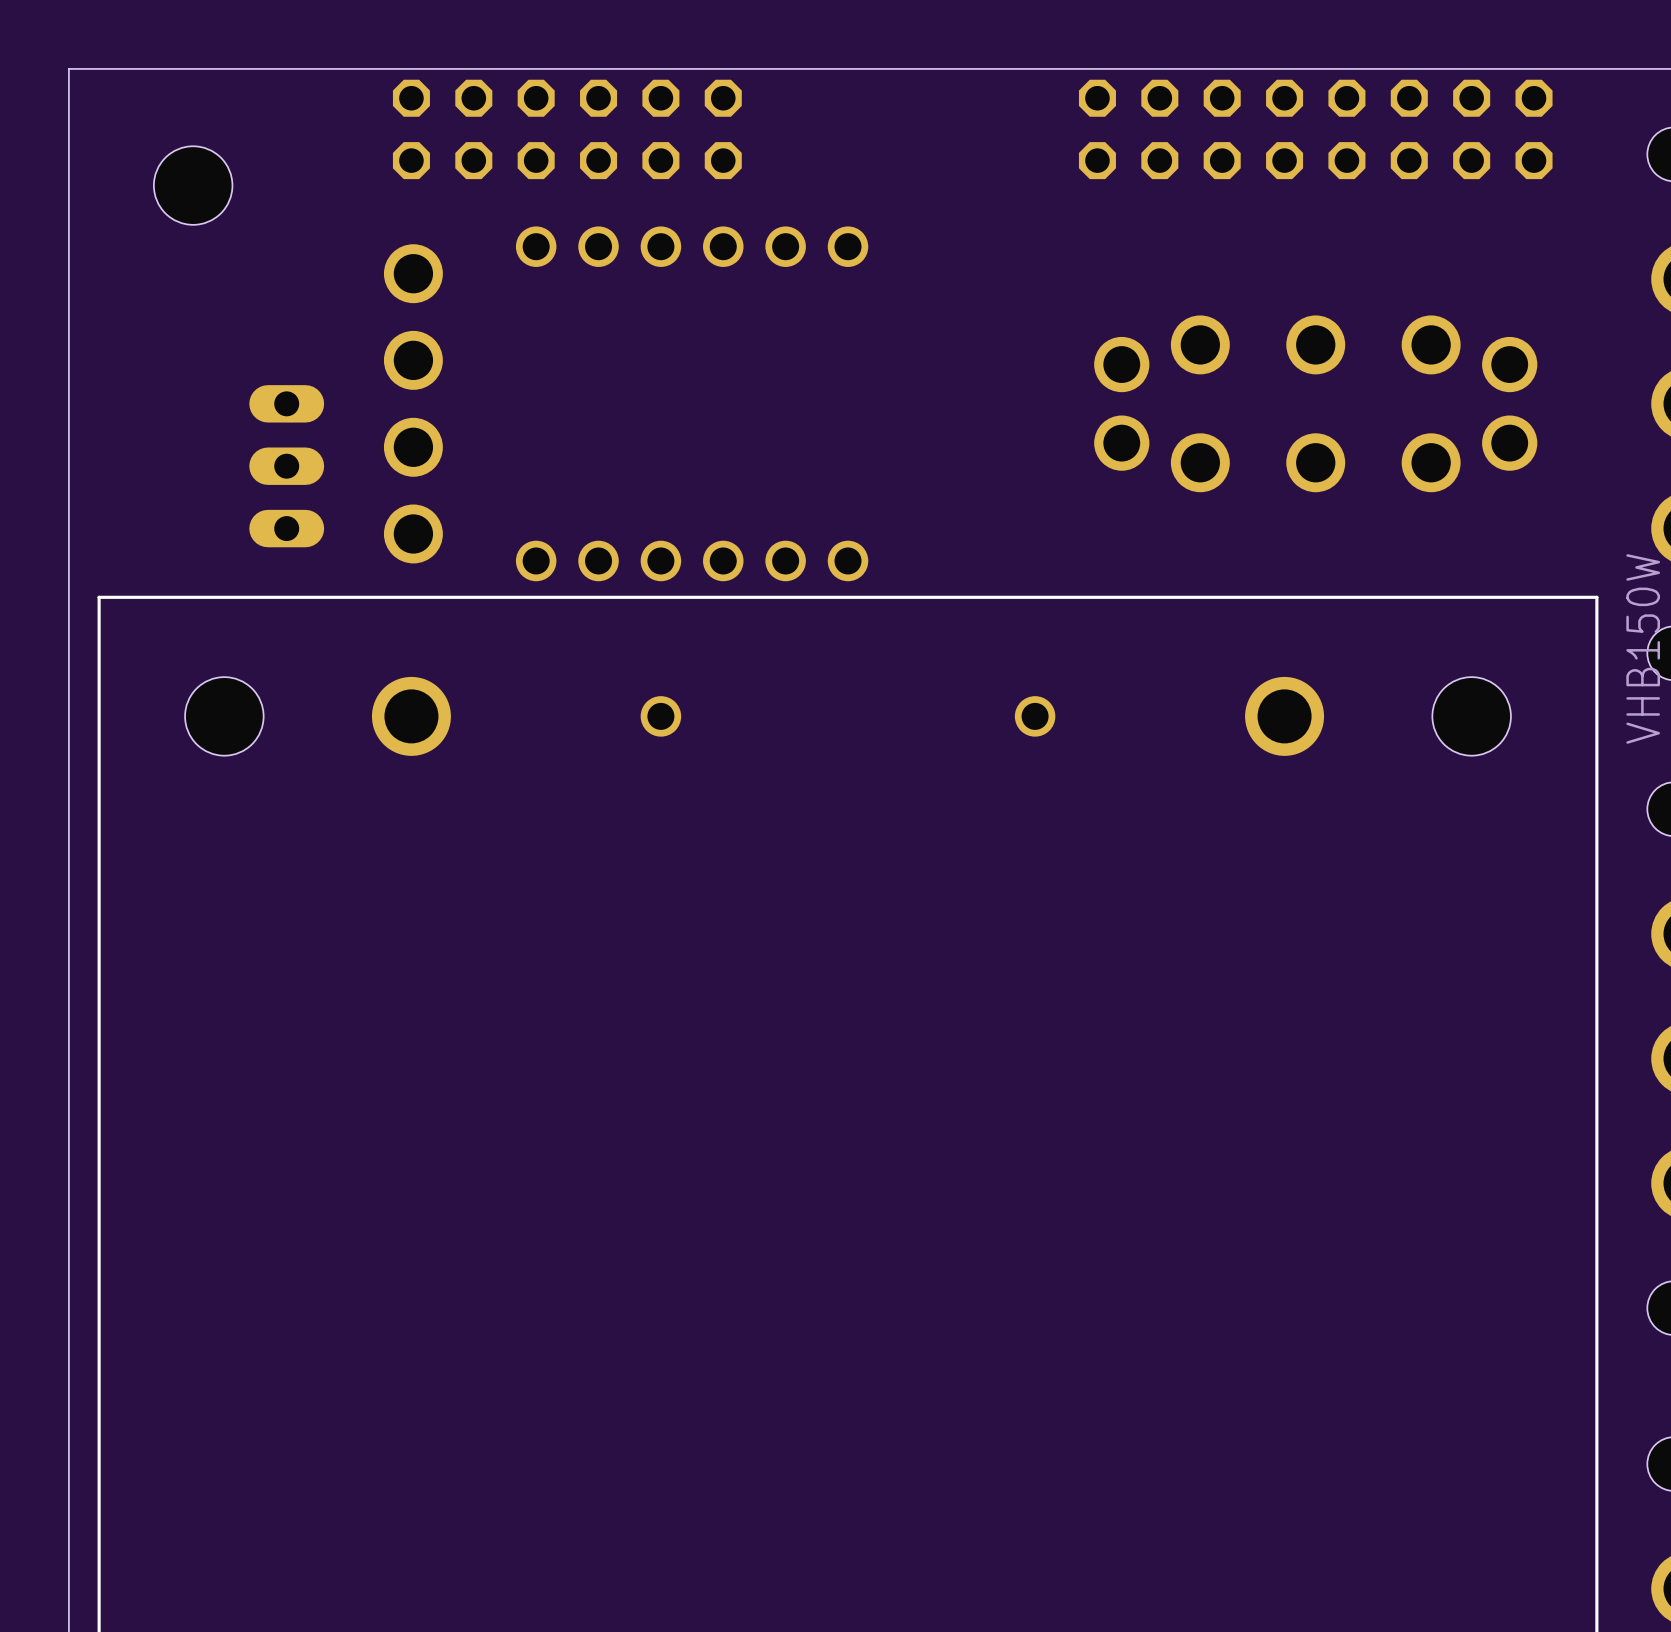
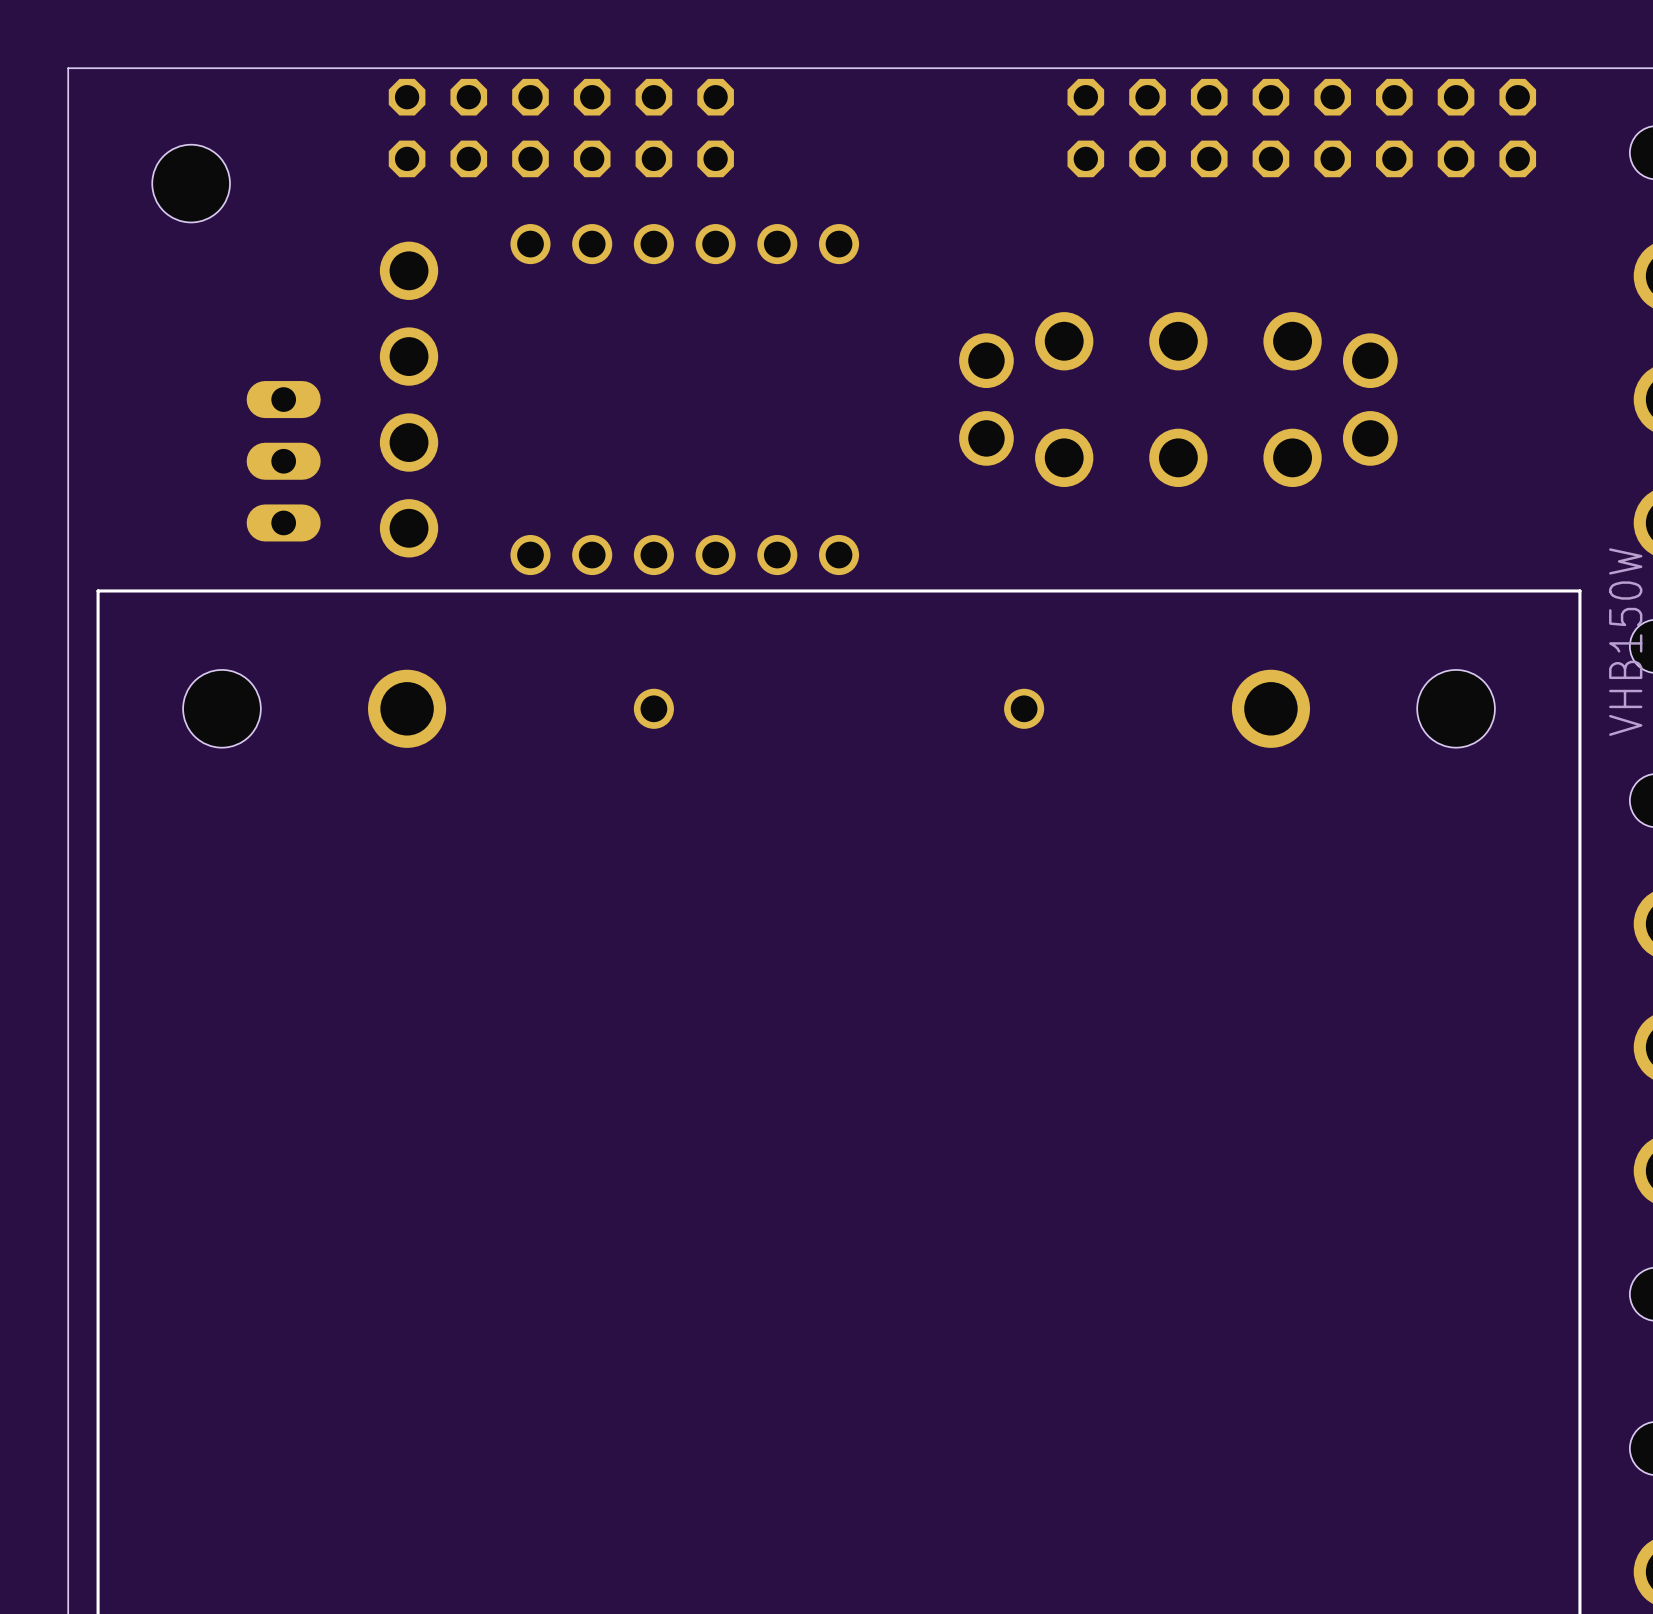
part position: (1315, 403) -> (1178, 399)

